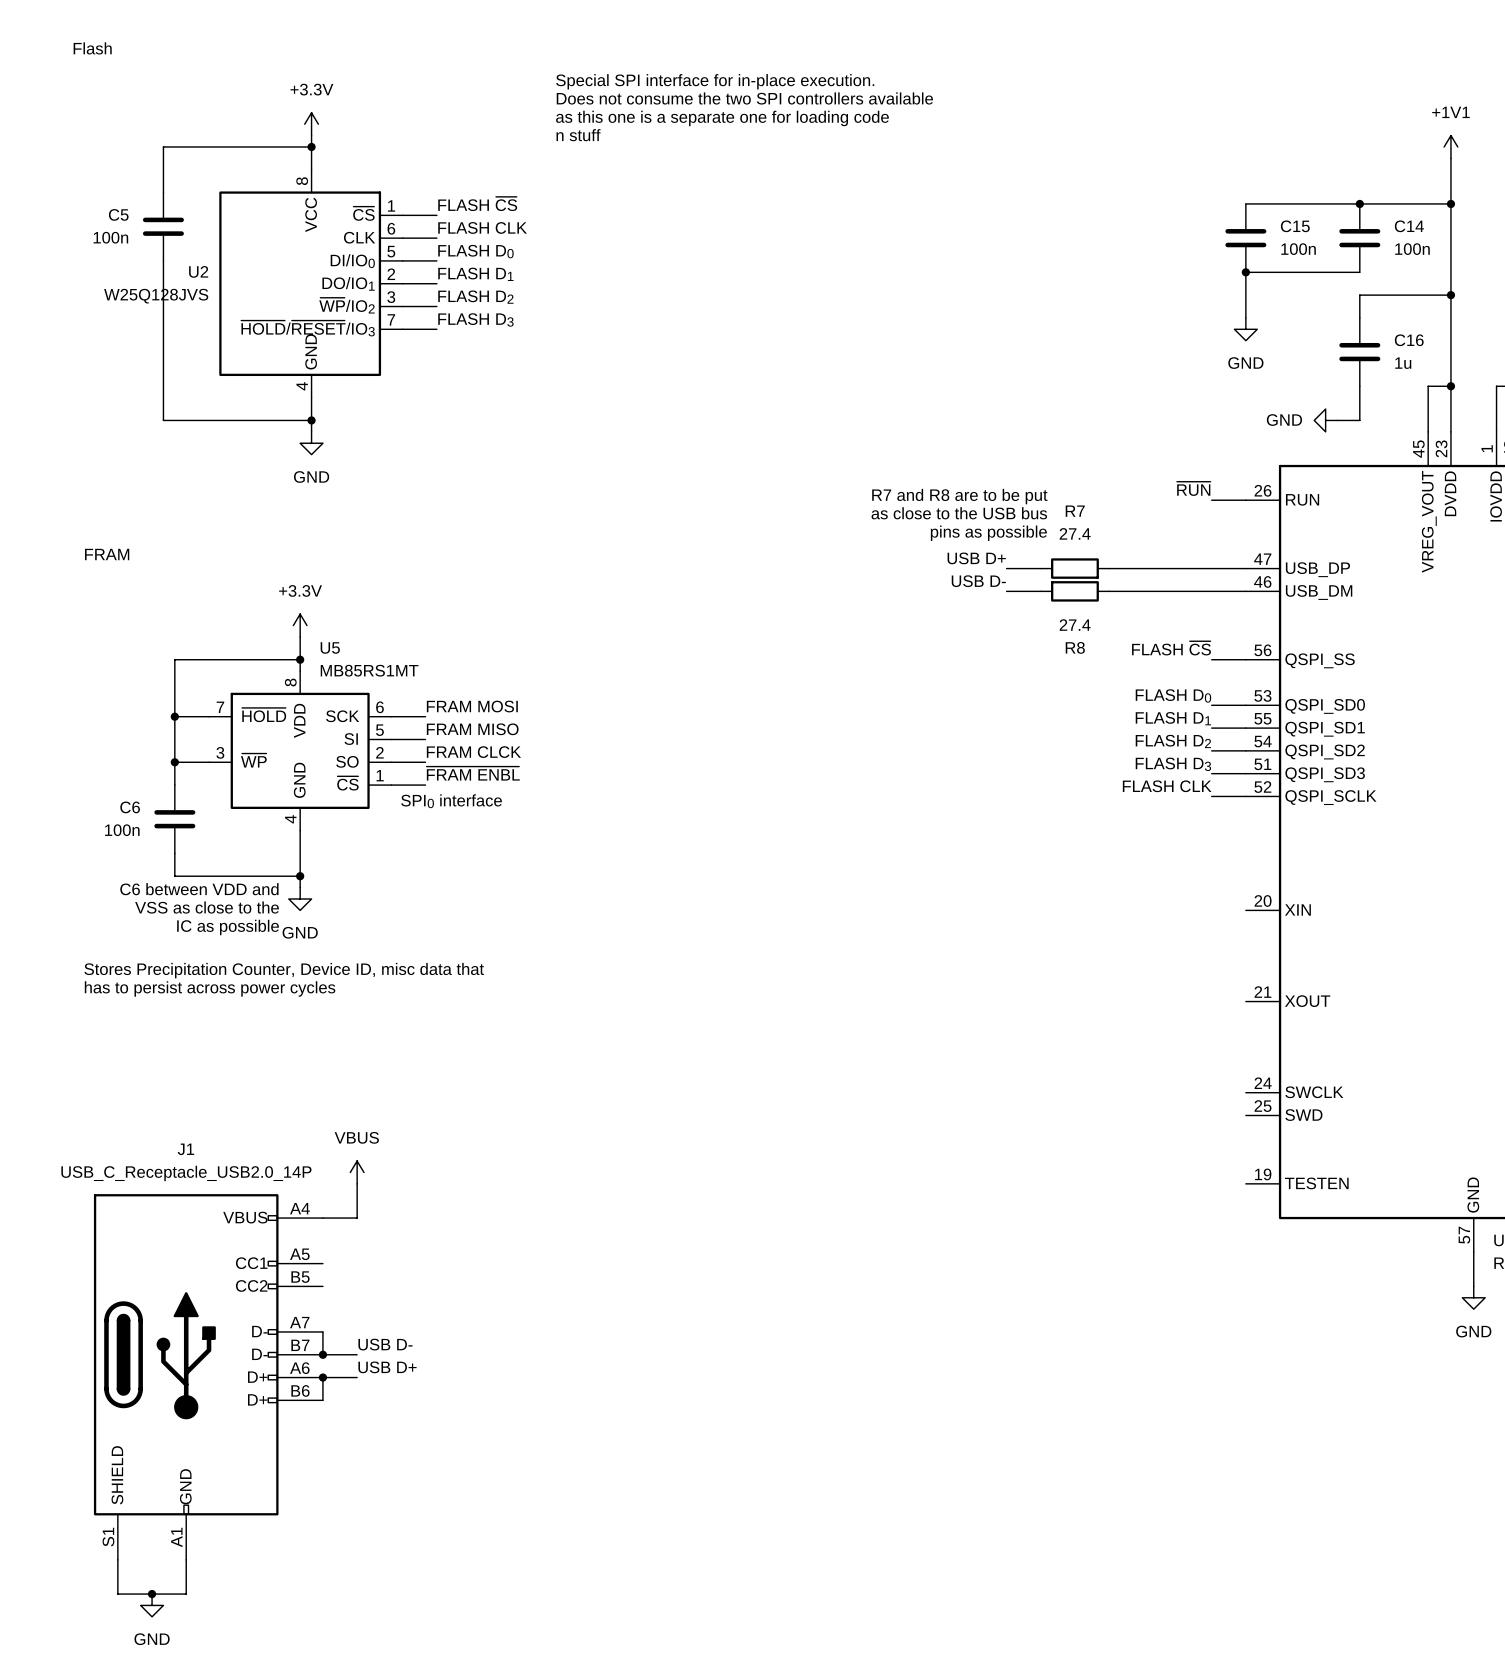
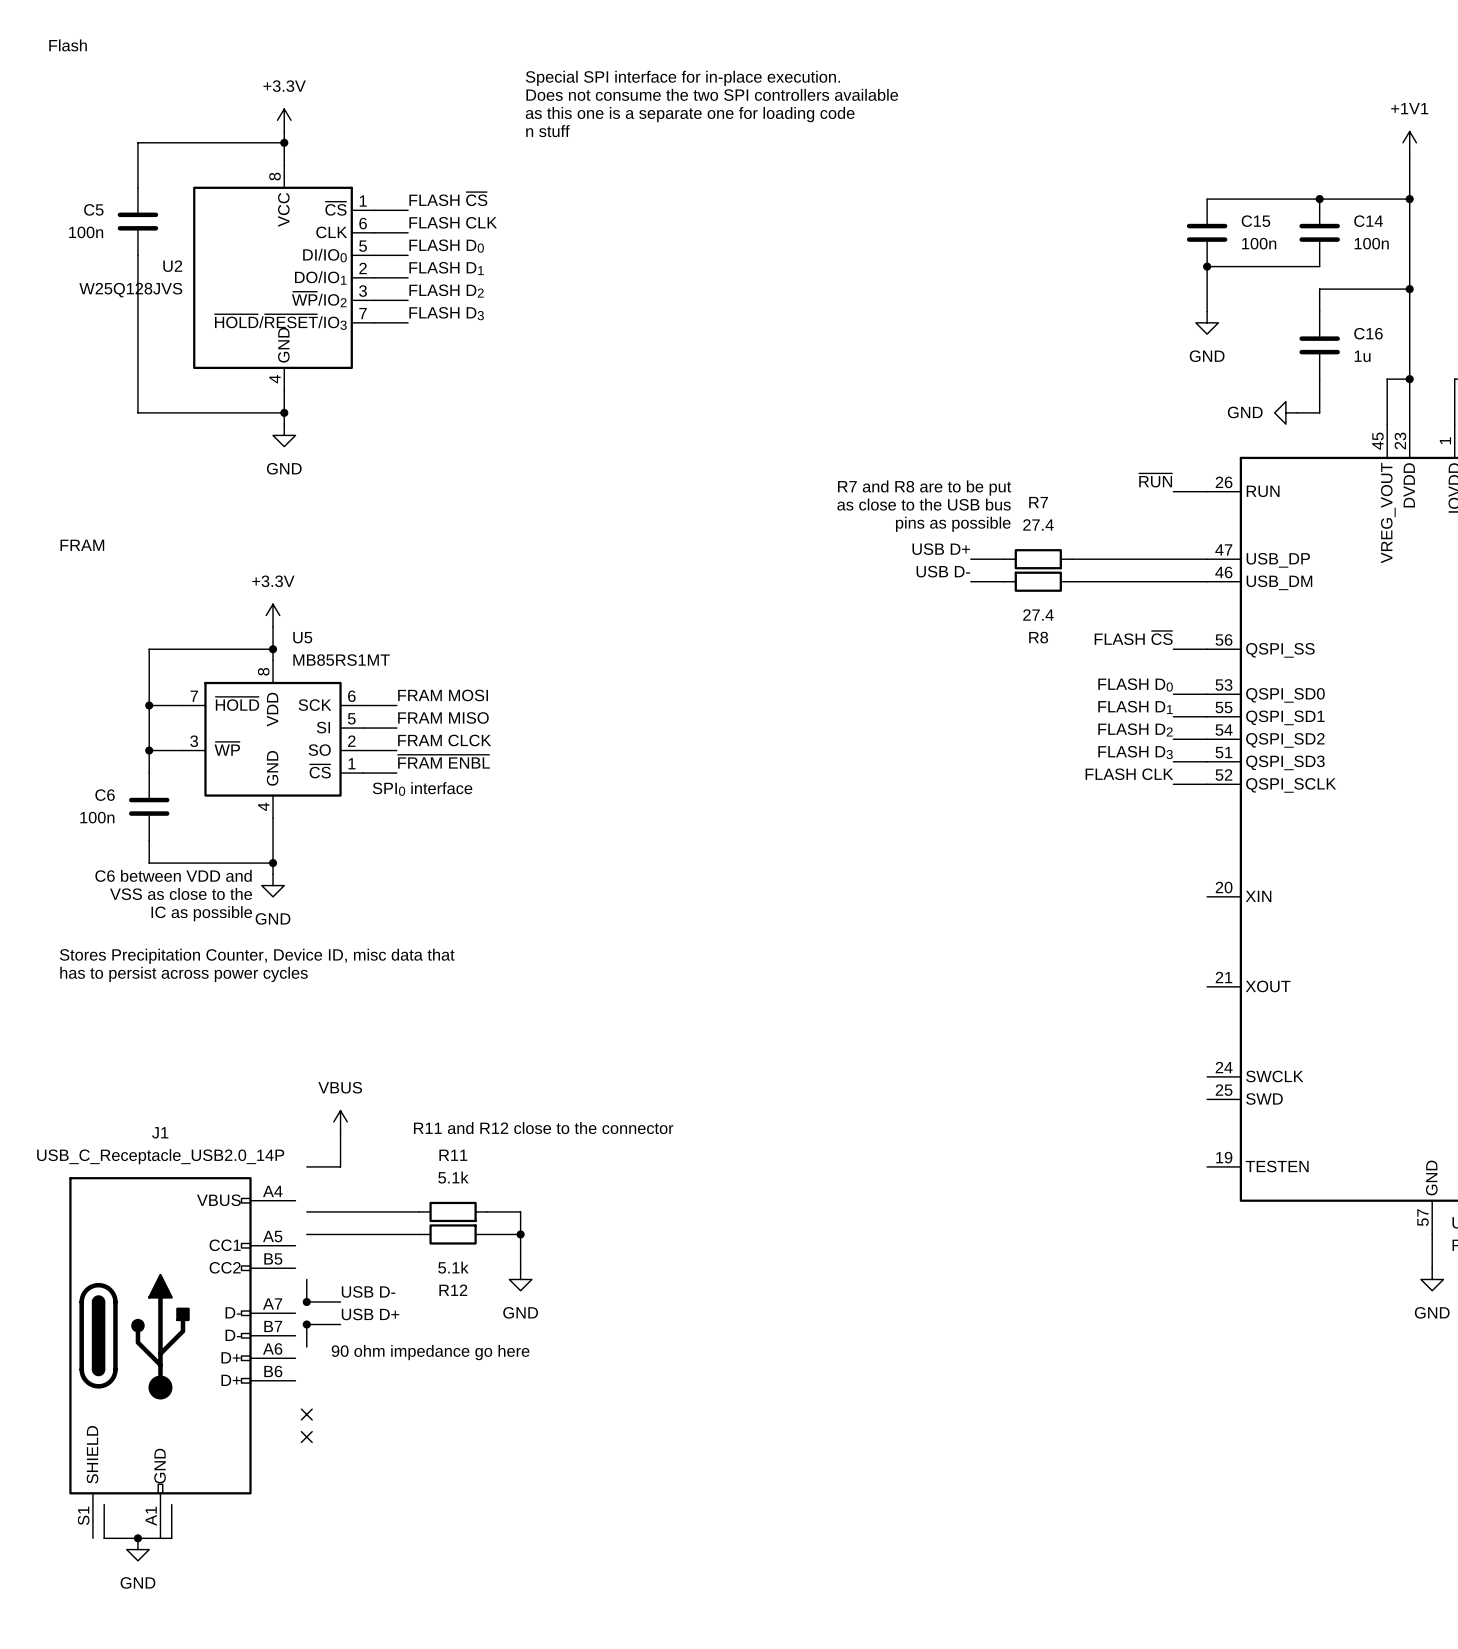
text: none -> R11 and R12 close to the connector (543, 1128)
power symbol position: VBUS (357, 1172) -> VBUS (340, 1121)
wire: (357, 1183) (357, 1218) (322, 1218) -> (340, 1133) (340, 1166) (306, 1166)
wire: none -> (306, 1211) (419, 1211)
R11: none -> 5.1k (453, 1211)
wire: none -> (486, 1211) (520, 1211) (520, 1268)
wire: none -> (306, 1234) (419, 1234)
R12: none -> 5.1k (453, 1234)
wire: none -> (486, 1234) (520, 1234)
junction: none -> (520, 1234)
power symbol: none -> GND (520, 1279)
junction: none -> (306, 1301)
wire: (322, 1331) (322, 1354) (357, 1354) -> (306, 1279) (306, 1301) (340, 1301)
label position: USB D- (385, 1344) -> USB D- (368, 1291)
junction position: (322, 1354) -> (306, 1324)
label position: USB D+ (387, 1367) -> USB D+ (370, 1314)
text: none -> 90 ohm impedance go here (430, 1352)
junction: (322, 1377) -> none
wire: (357, 1377) (322, 1377) (322, 1400) -> (340, 1324) (306, 1324) (306, 1347)
no-connect mark: none -> (306, 1414)
no-connect mark: none -> (306, 1437)
wire: (117, 1559) (117, 1594) (186, 1594) (186, 1559) -> (104, 1504) (104, 1538) (171, 1538) (171, 1504)
junction position: (152, 1594) -> (137, 1538)
power symbol position: GND (152, 1605) -> GND (137, 1549)

